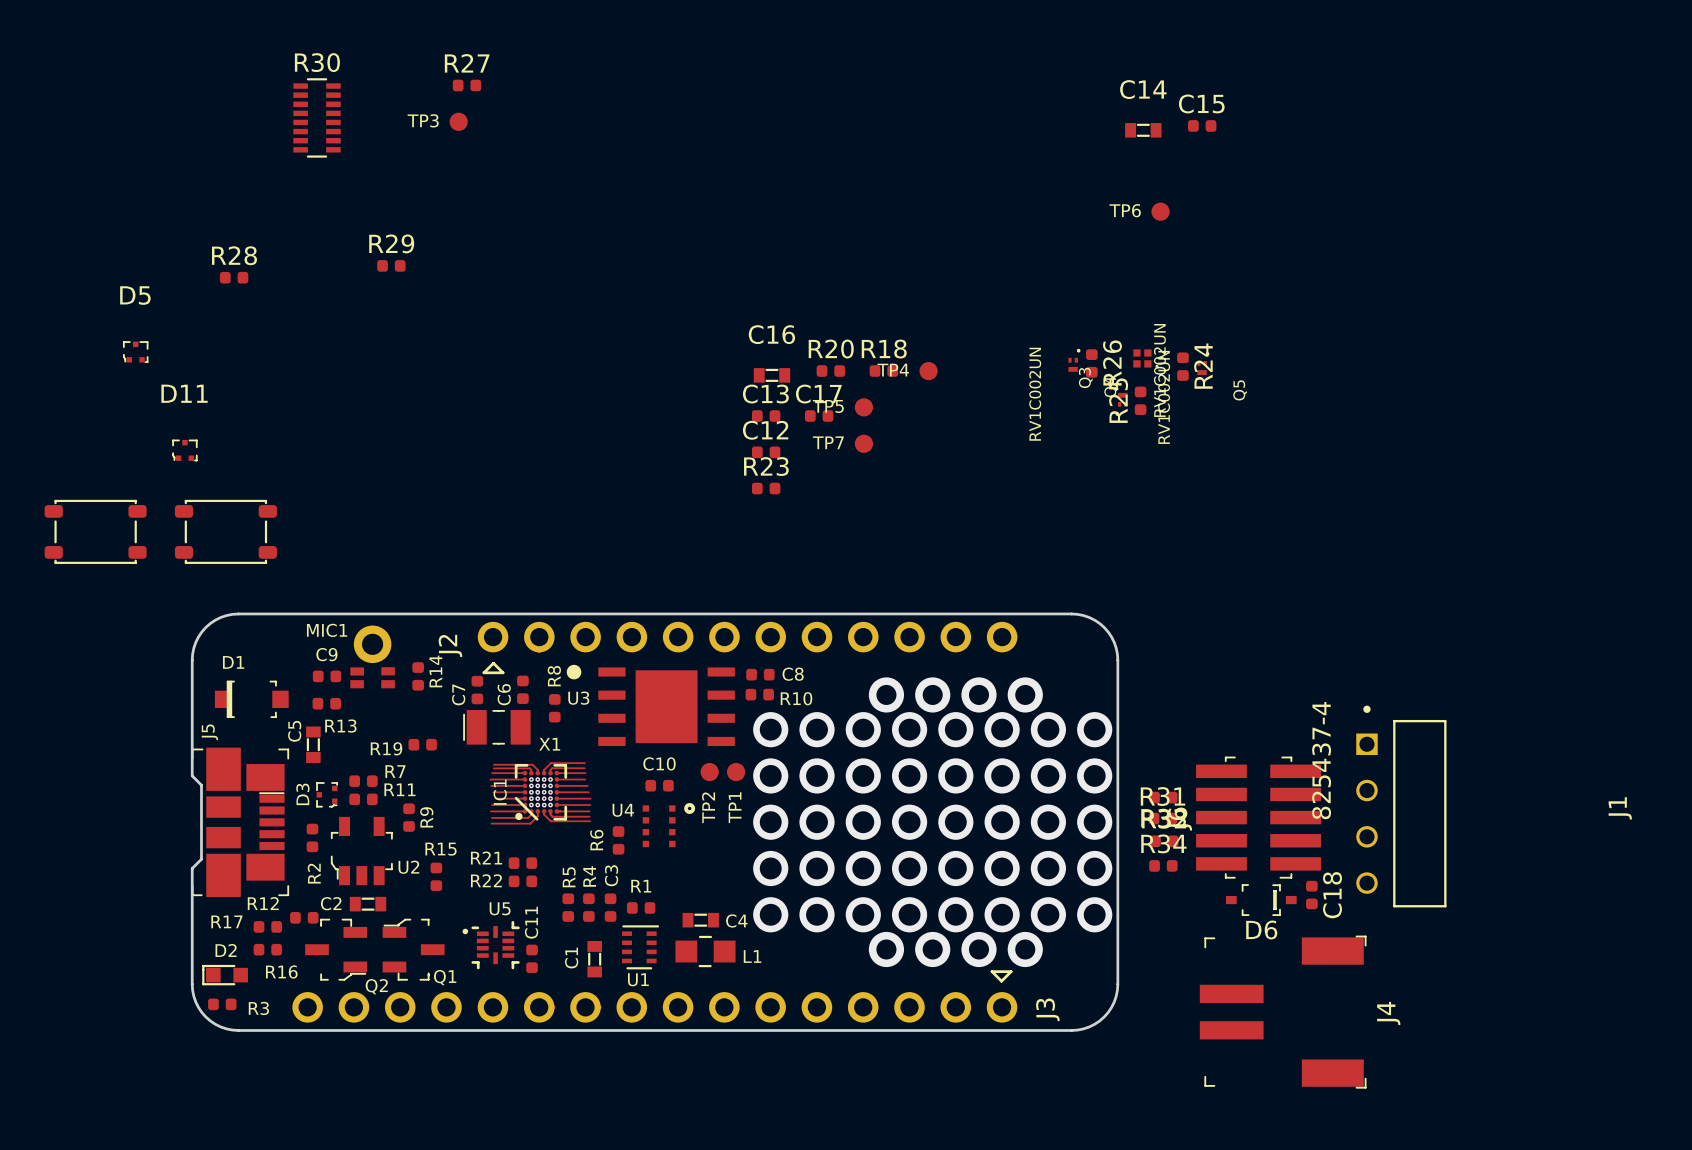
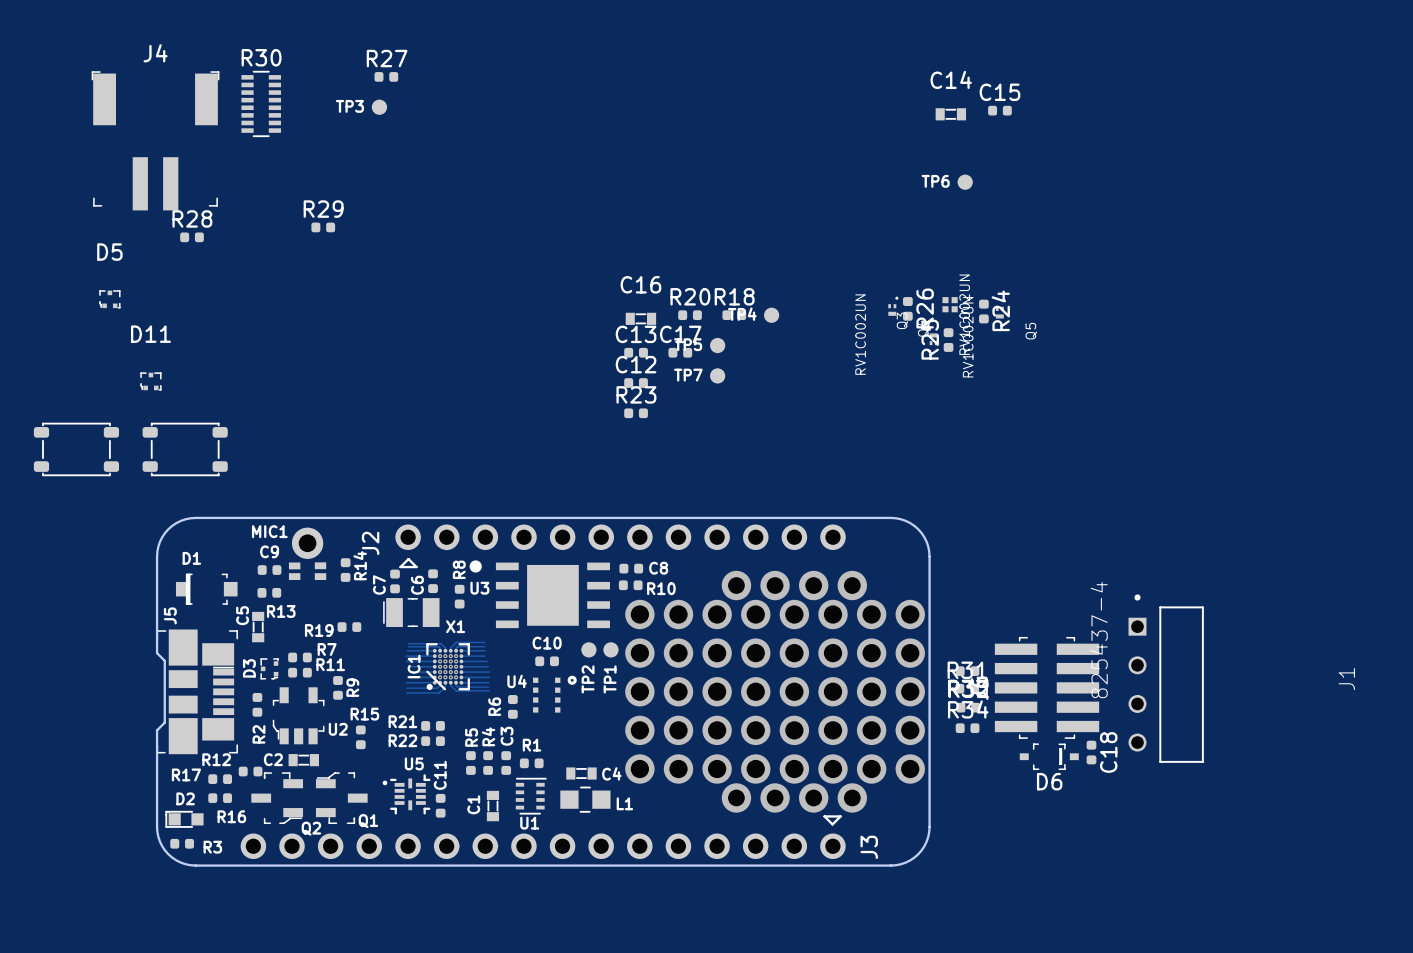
J4 rotation: 0° (1283, 1012) -> 90° counterclockwise (155, 140)
J4 position: (1283, 1012) -> (155, 140)

